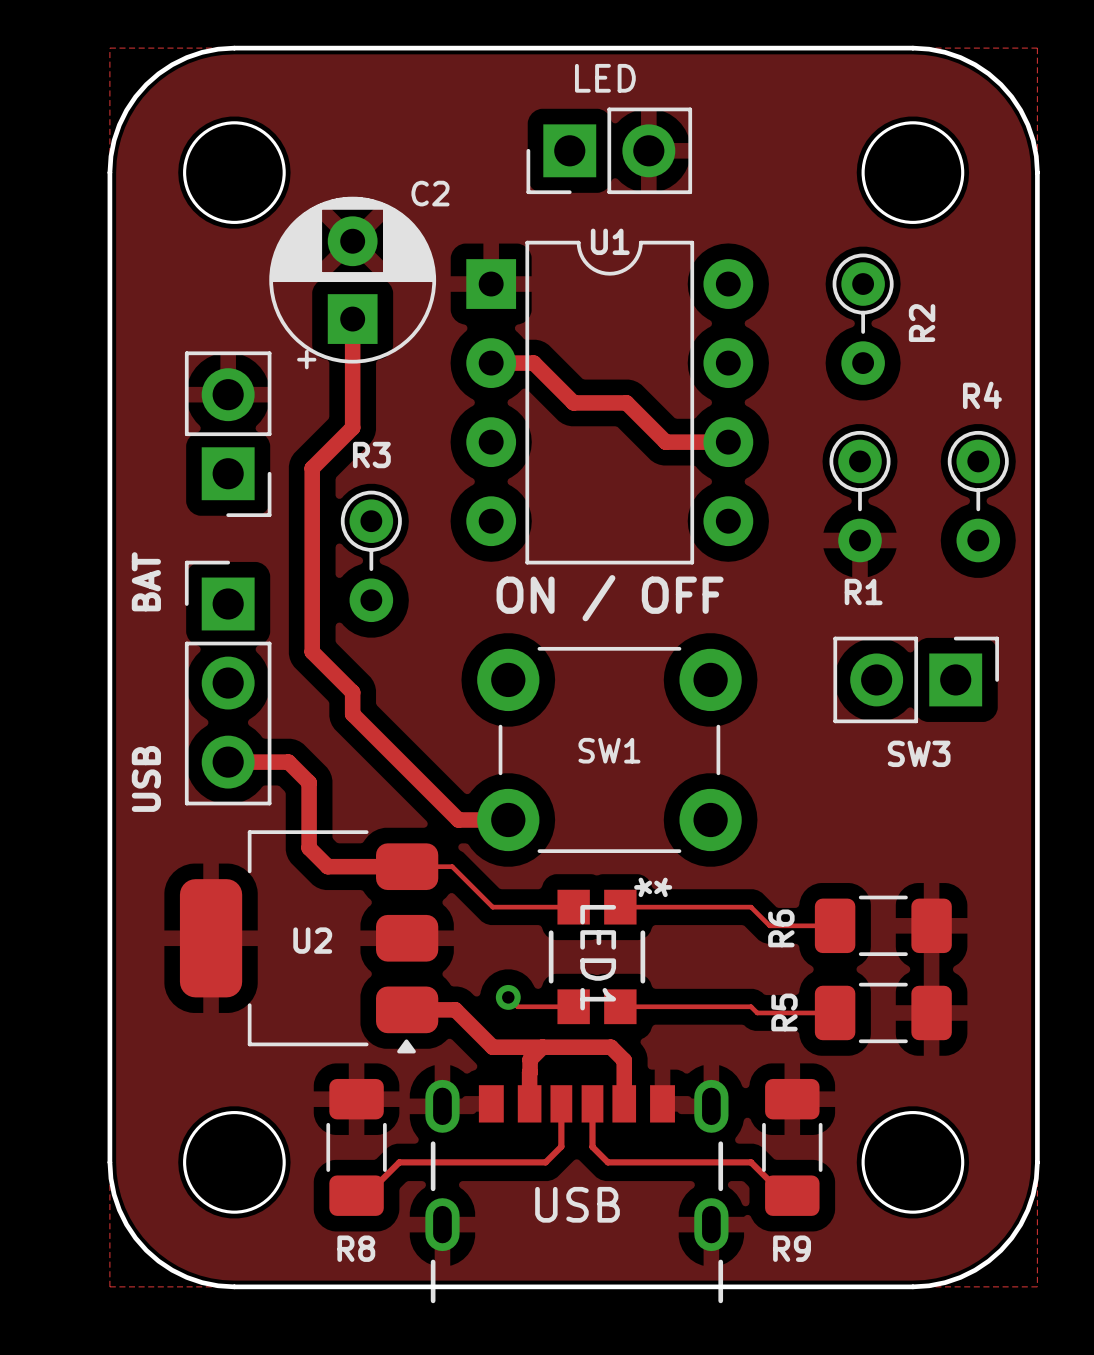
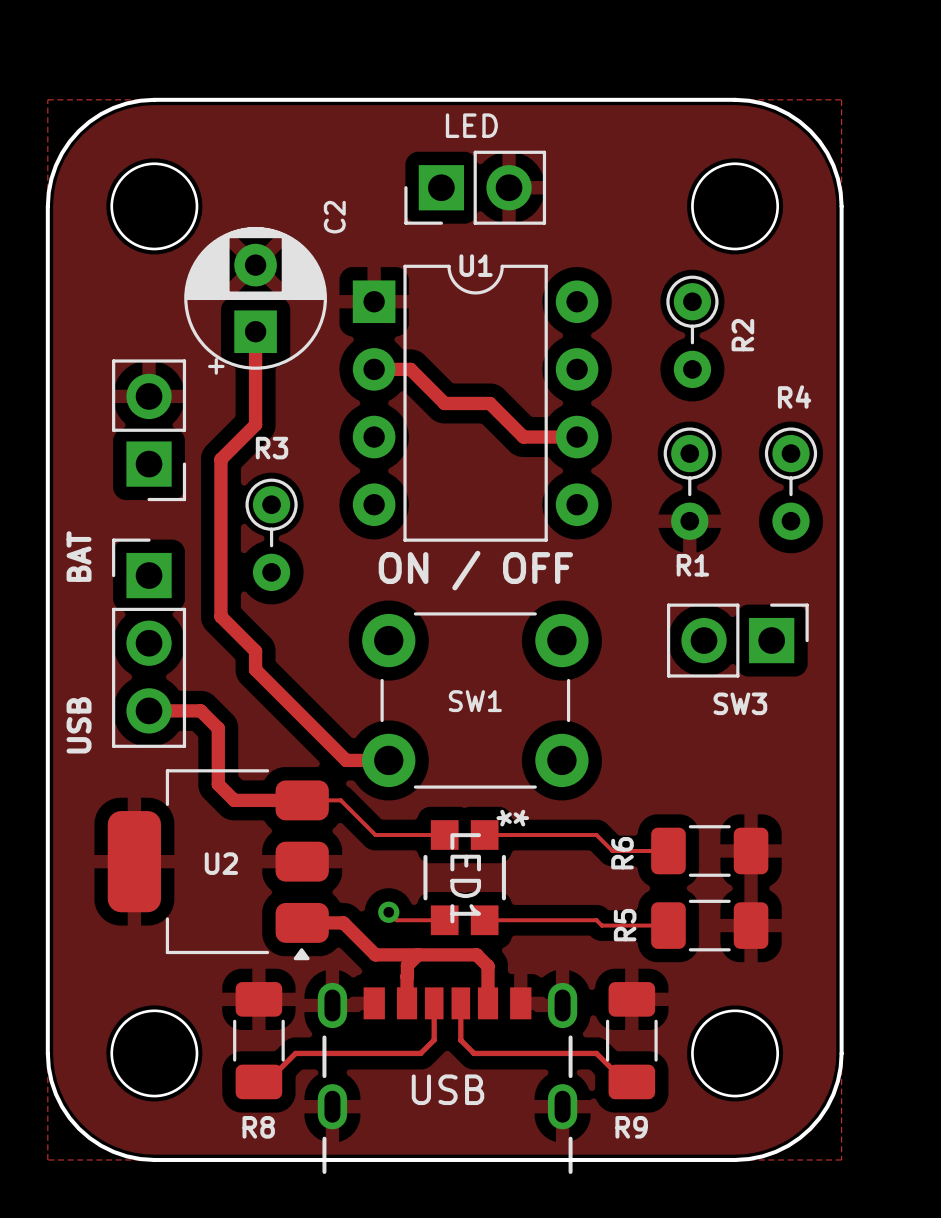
C2 name rotation: 0° (430, 193) -> 90° counterclockwise (334, 217)

